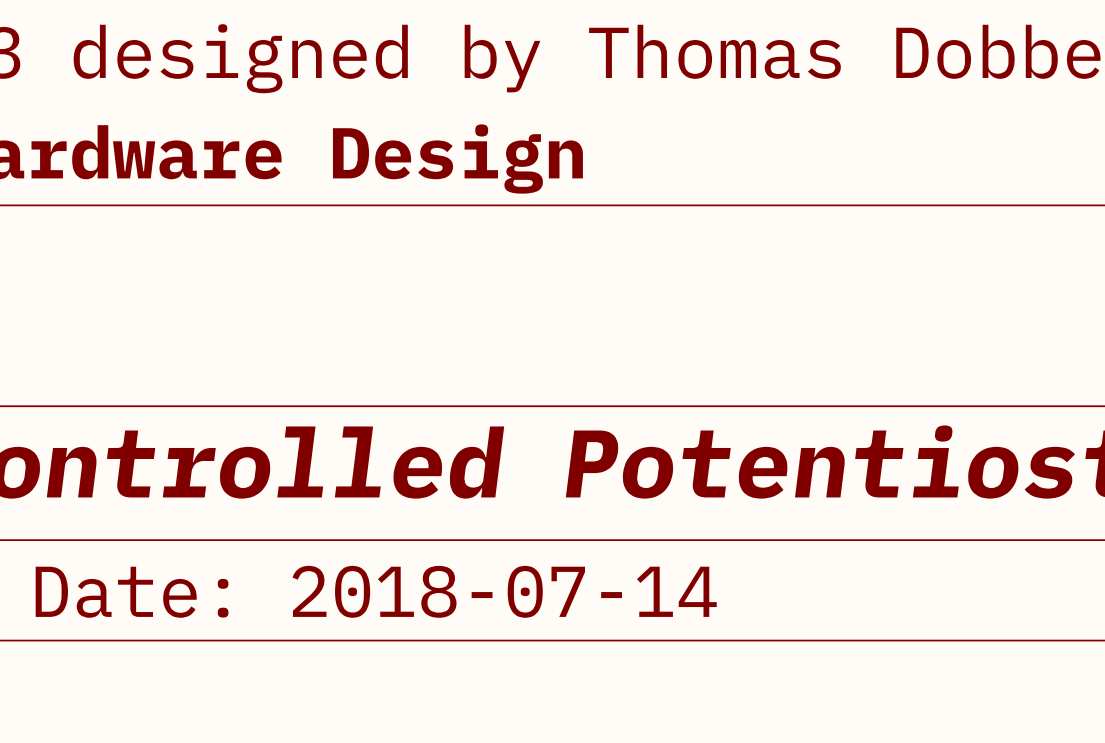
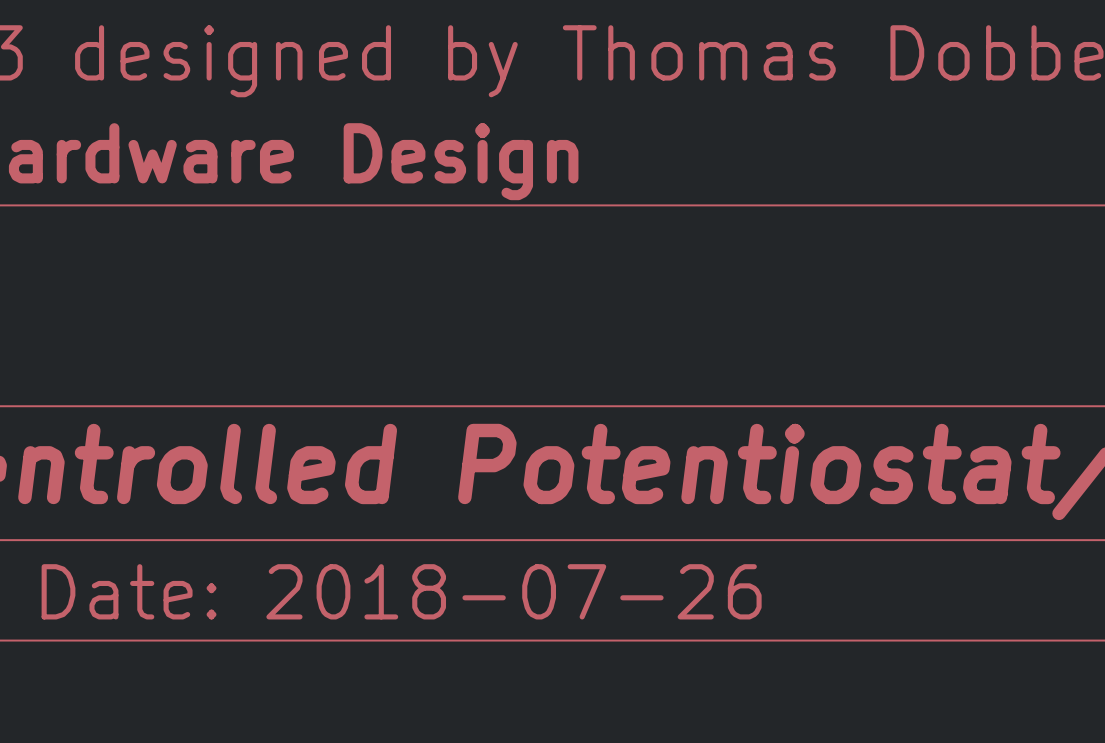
title block: Date: 2018-07-14 (376, 591) -> Date: 2018-07-26 (401, 591)

